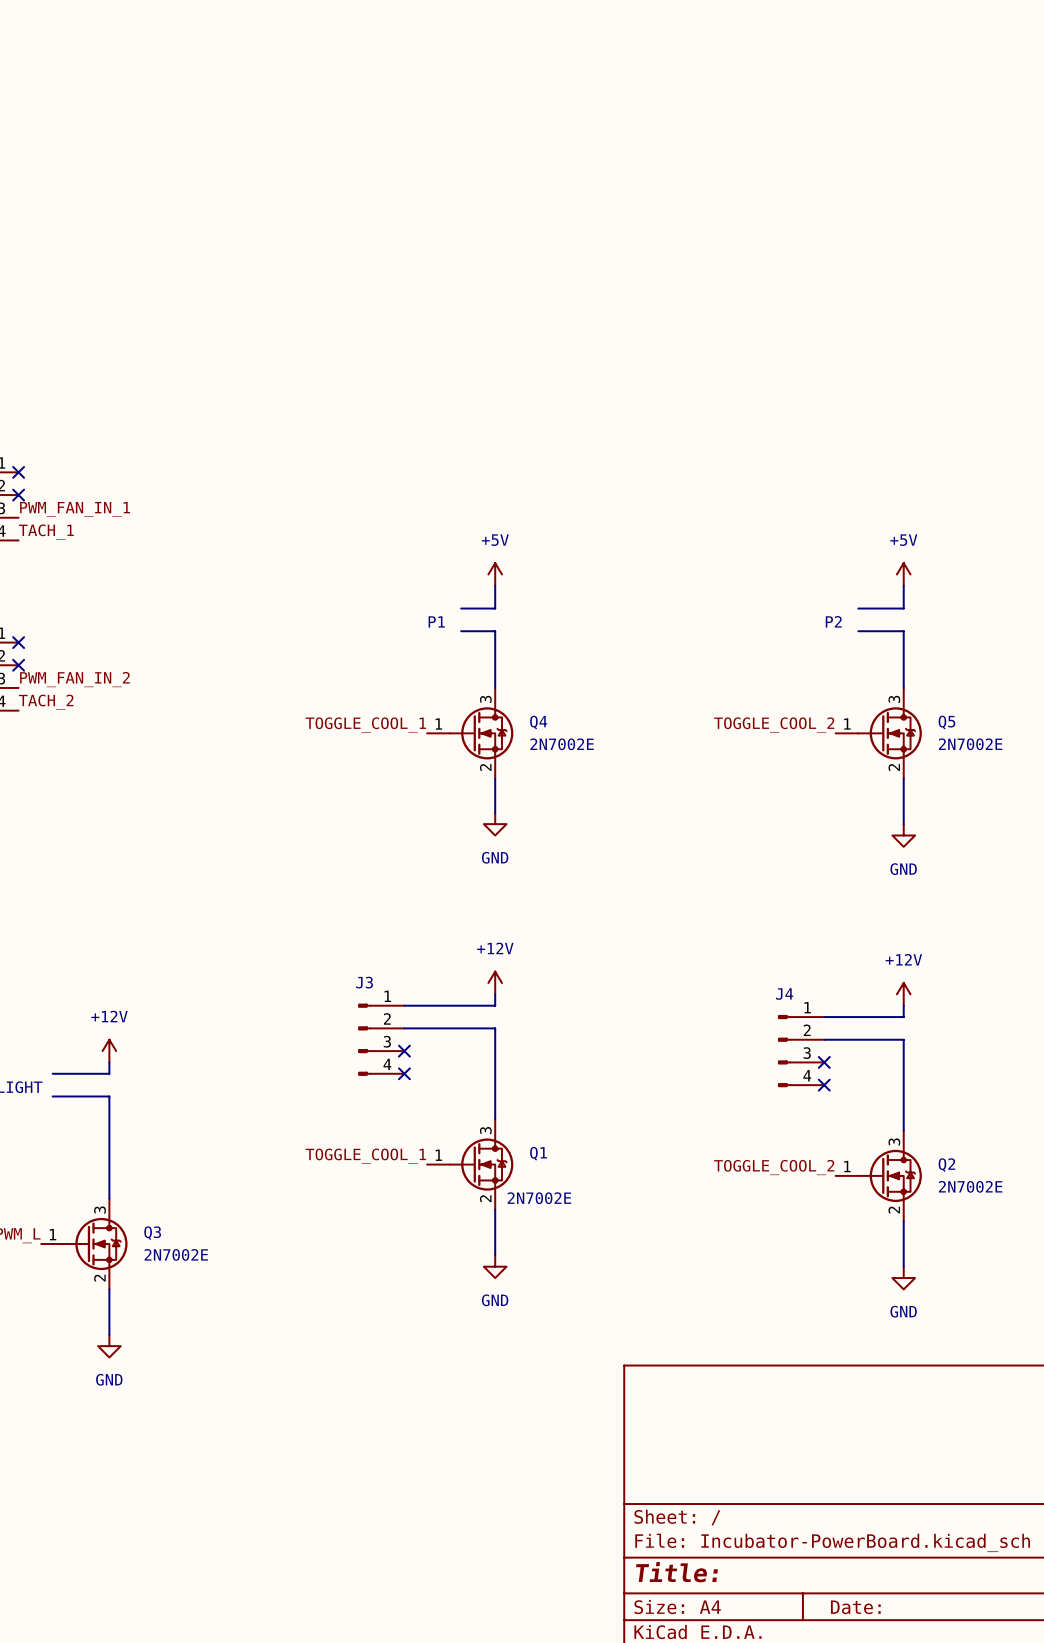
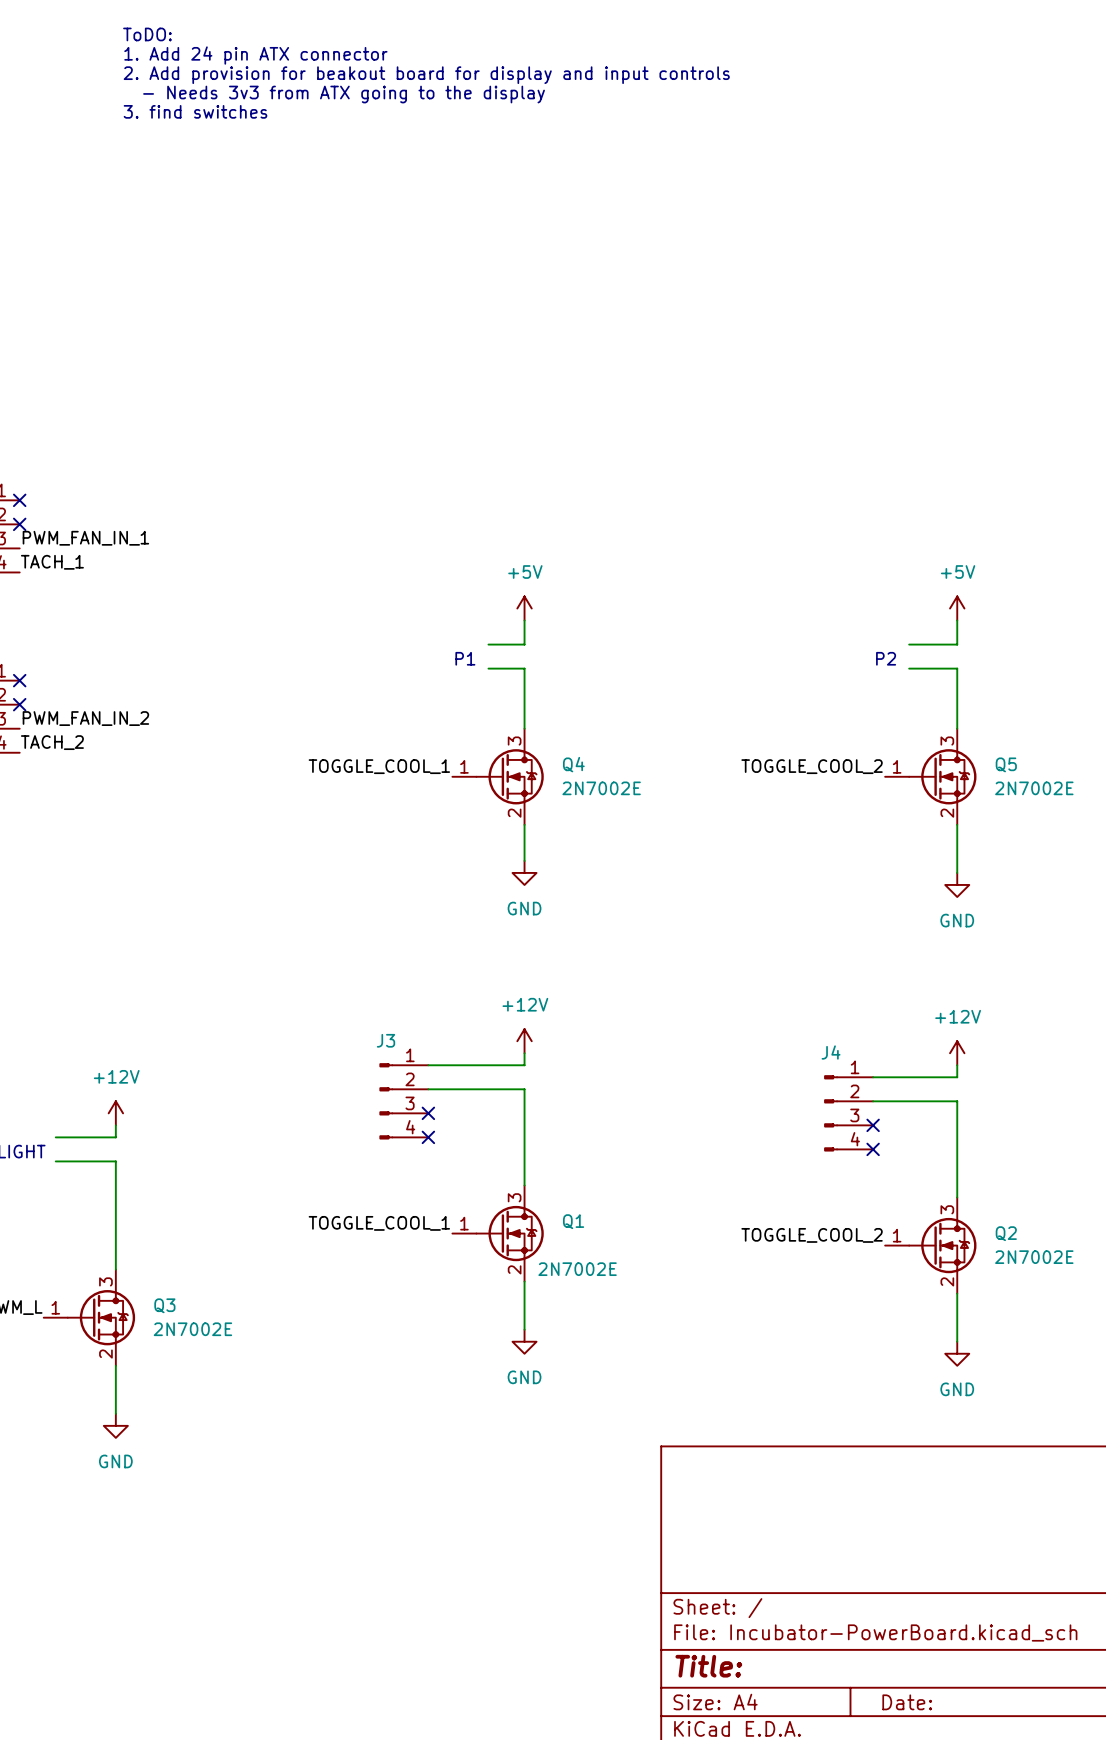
text: none -> ToDO: (147, 34)
text: none -> 1. Add 24 pin ATX connector (255, 55)
text: none -> 2. Add provision for beakout board for display and input controls (426, 75)
text: none -> - Needs 3v3 from ATX going to the display (344, 94)
text: none -> 3. find switches (195, 111)

